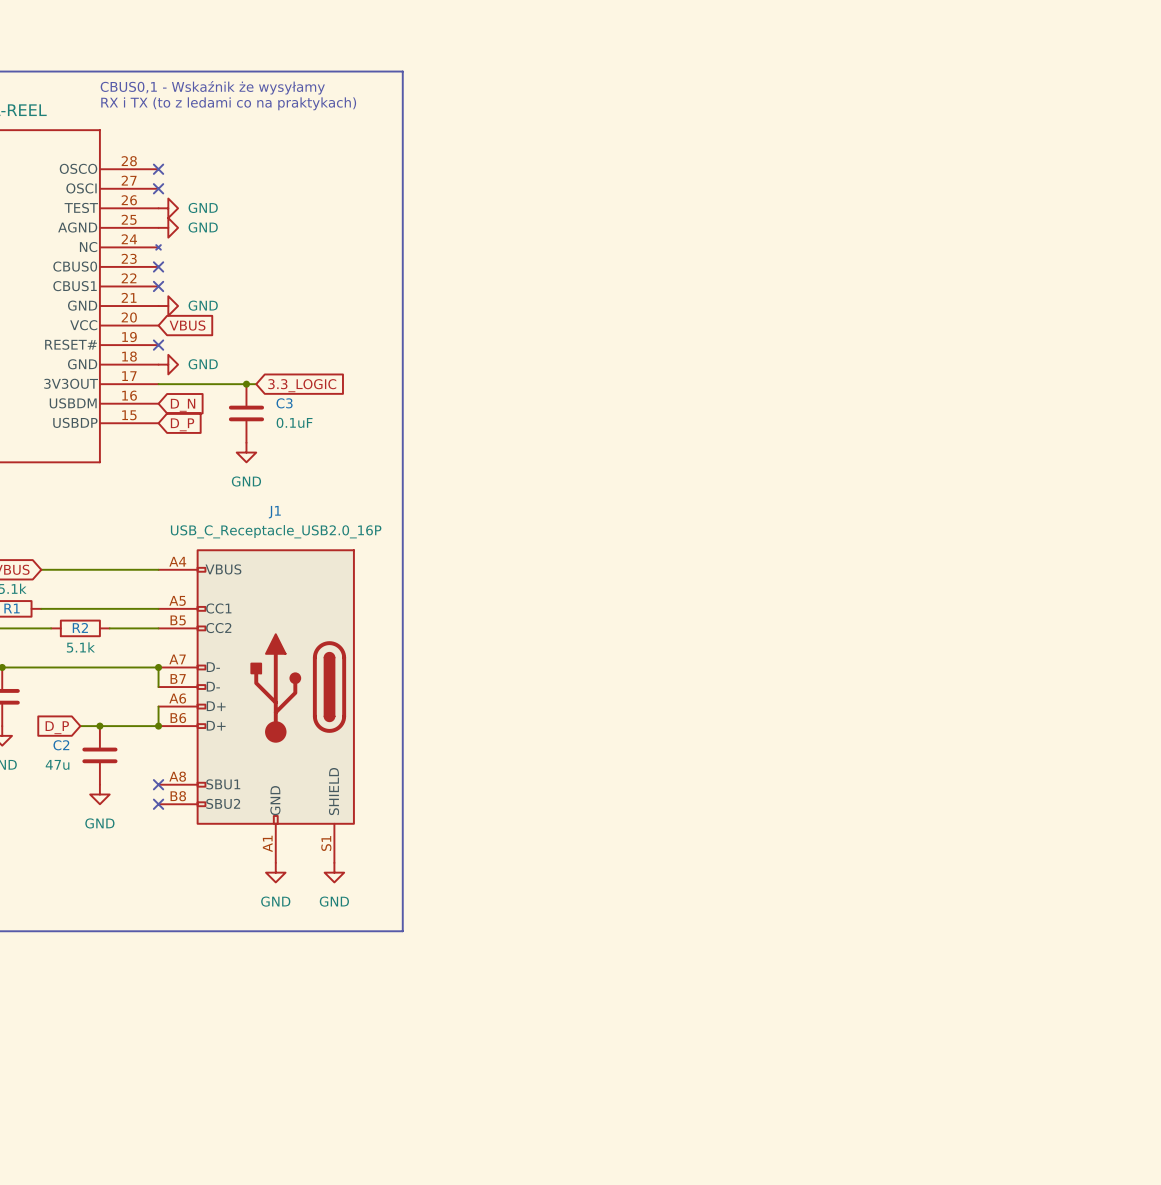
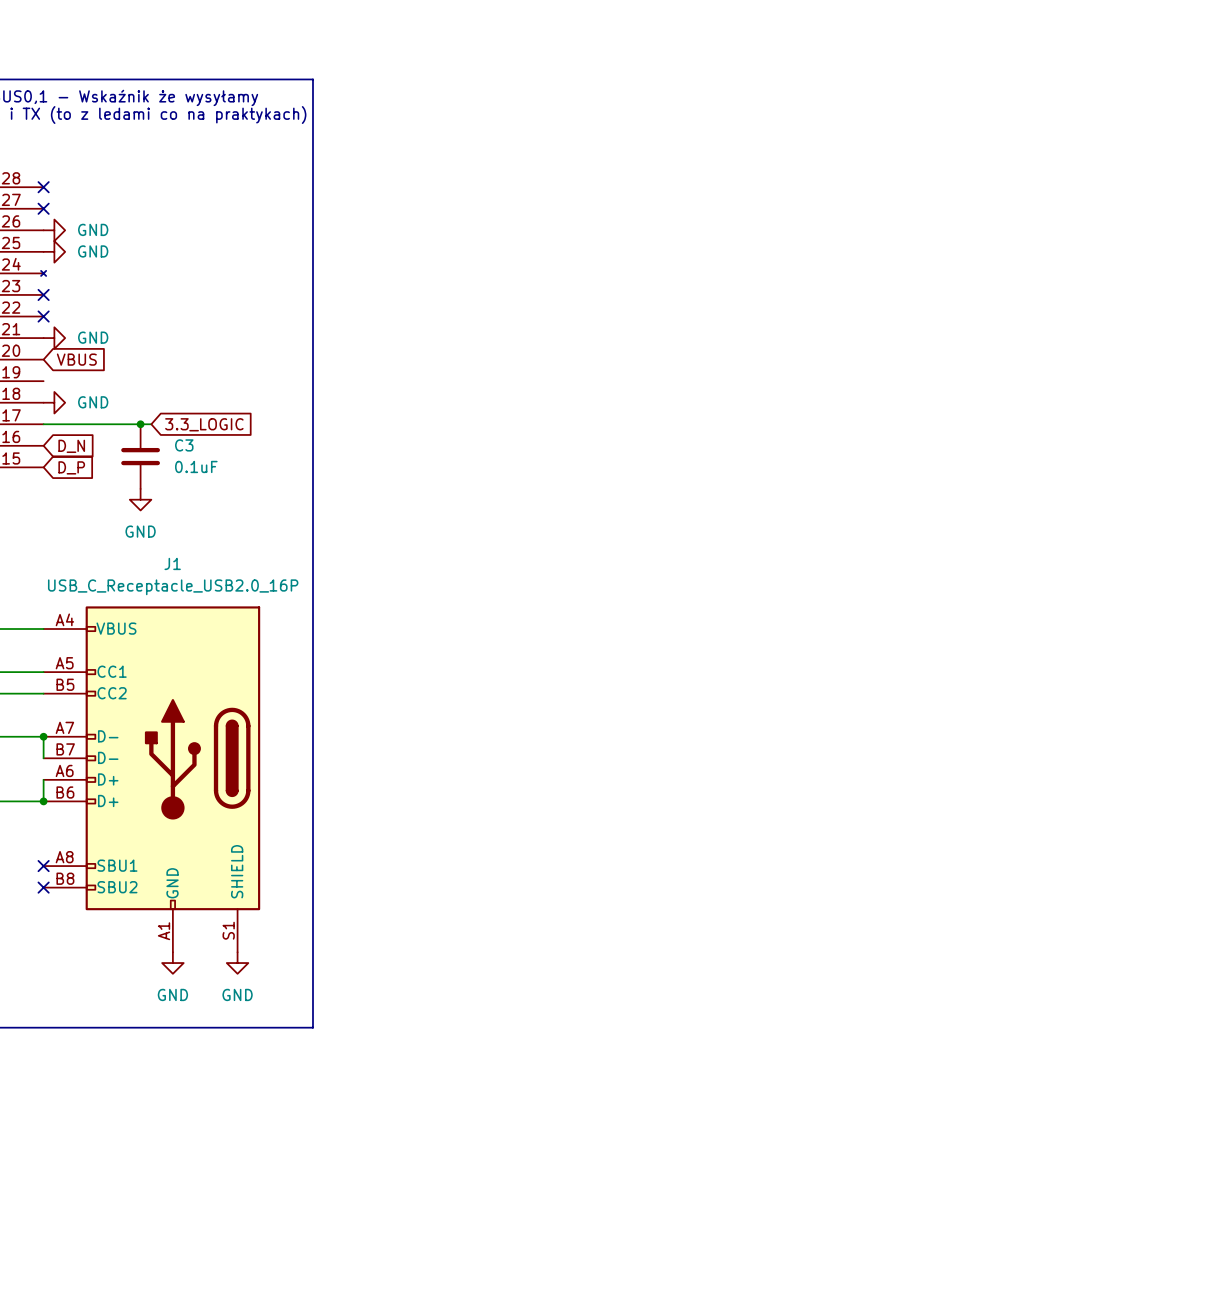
no-connect mark: (158, 345) -> none

